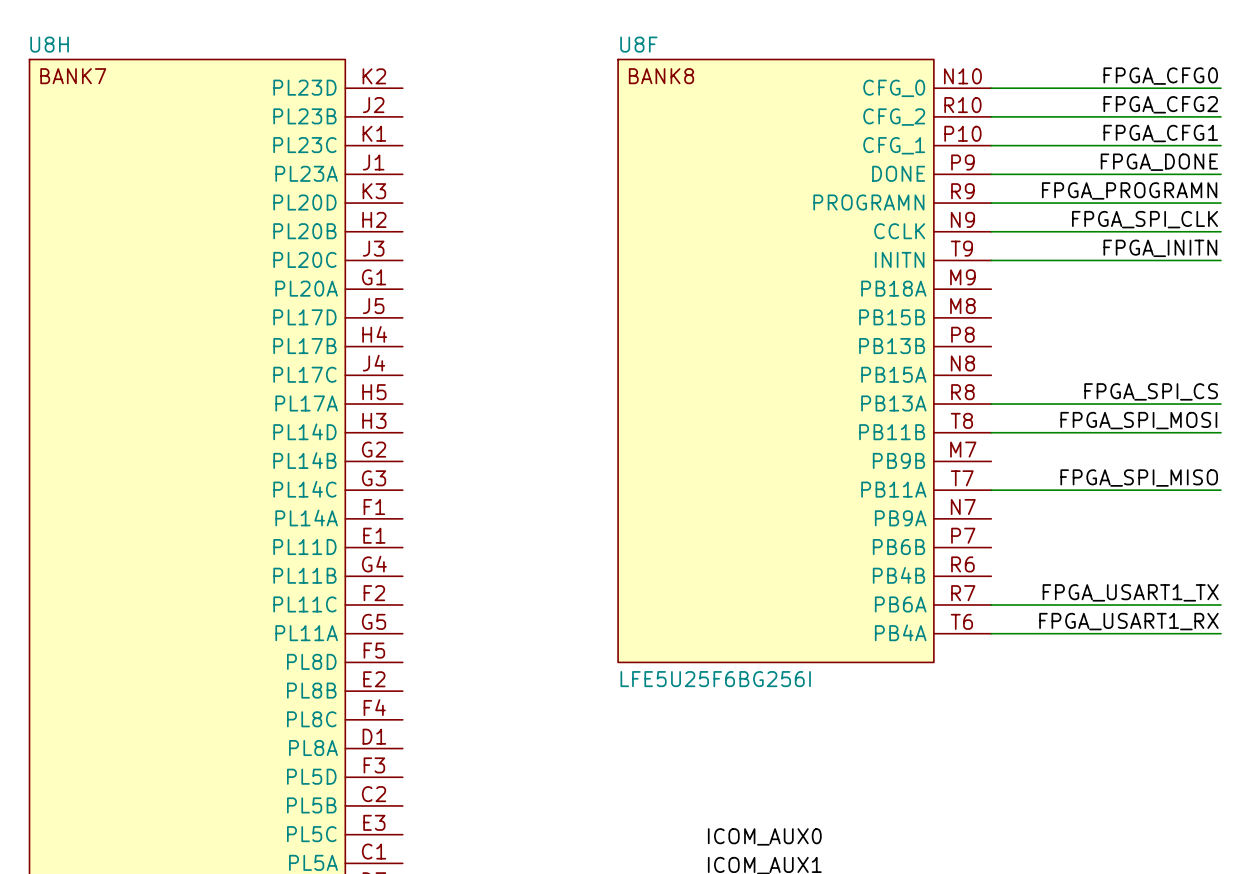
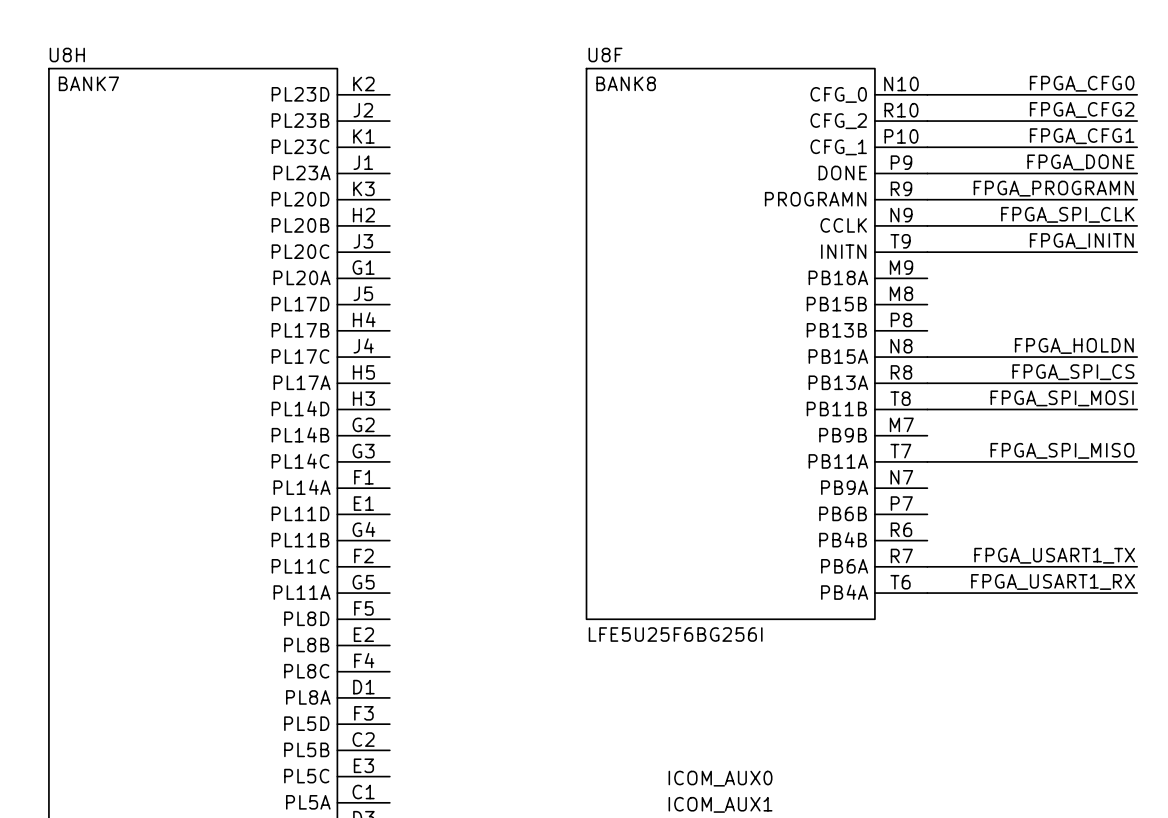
label: none -> FPGA_HOLDN (1074, 345)
wire: none -> (927, 357) (1137, 357)

